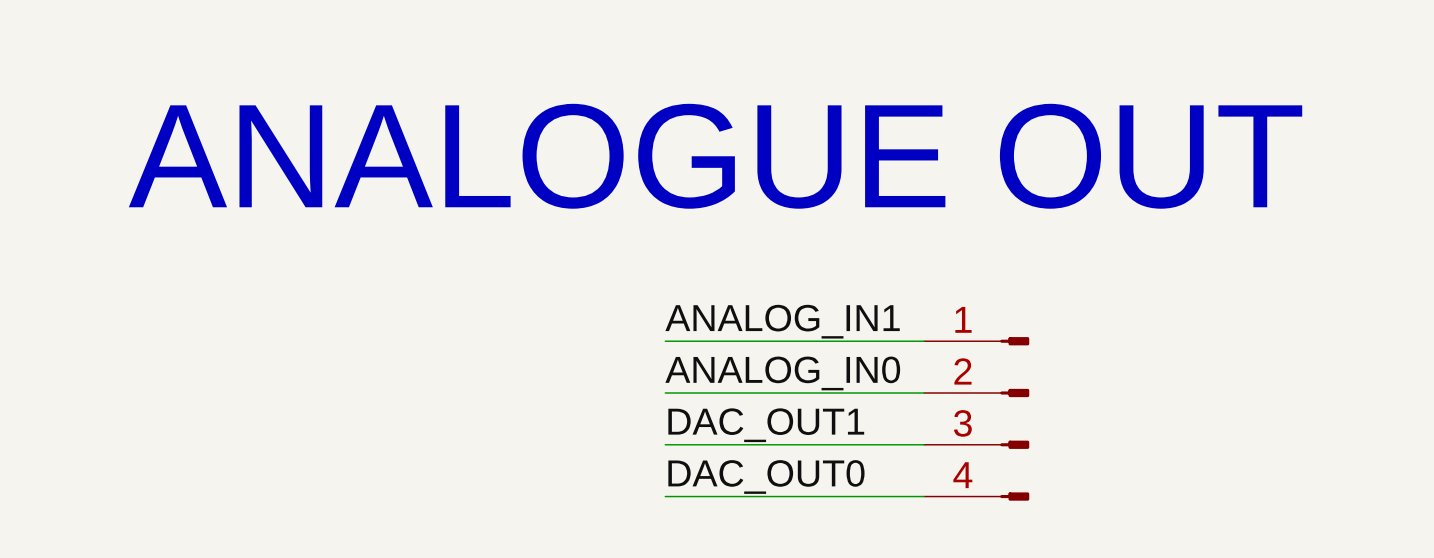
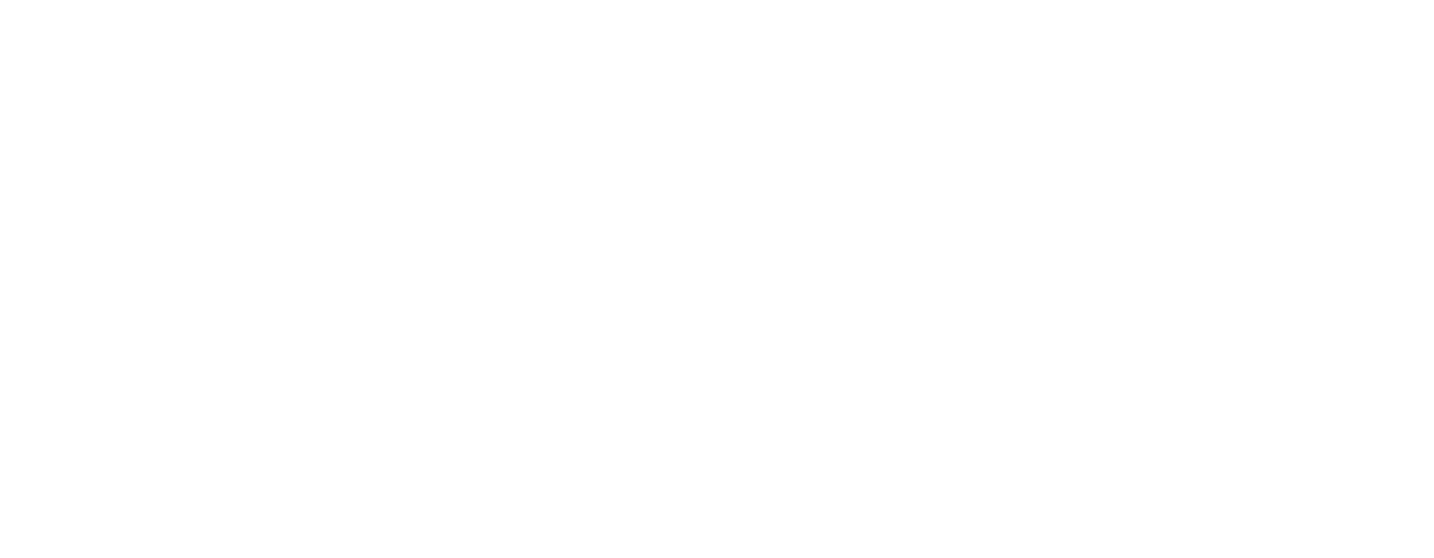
text: ANALOGUE OUT (715, 156) -> none
label: ANALOG_IN1 (782, 321) -> none
wire: (665, 341) (924, 341) -> none
label: ANALOG_IN0 (782, 373) -> none
wire: (665, 393) (924, 393) -> none
part: (976, 418) -> none
label: DAC_OUT1 (766, 425) -> none
wire: (665, 444) (924, 444) -> none
label: DAC_OUT0 (766, 476) -> none
wire: (665, 496) (924, 496) -> none

